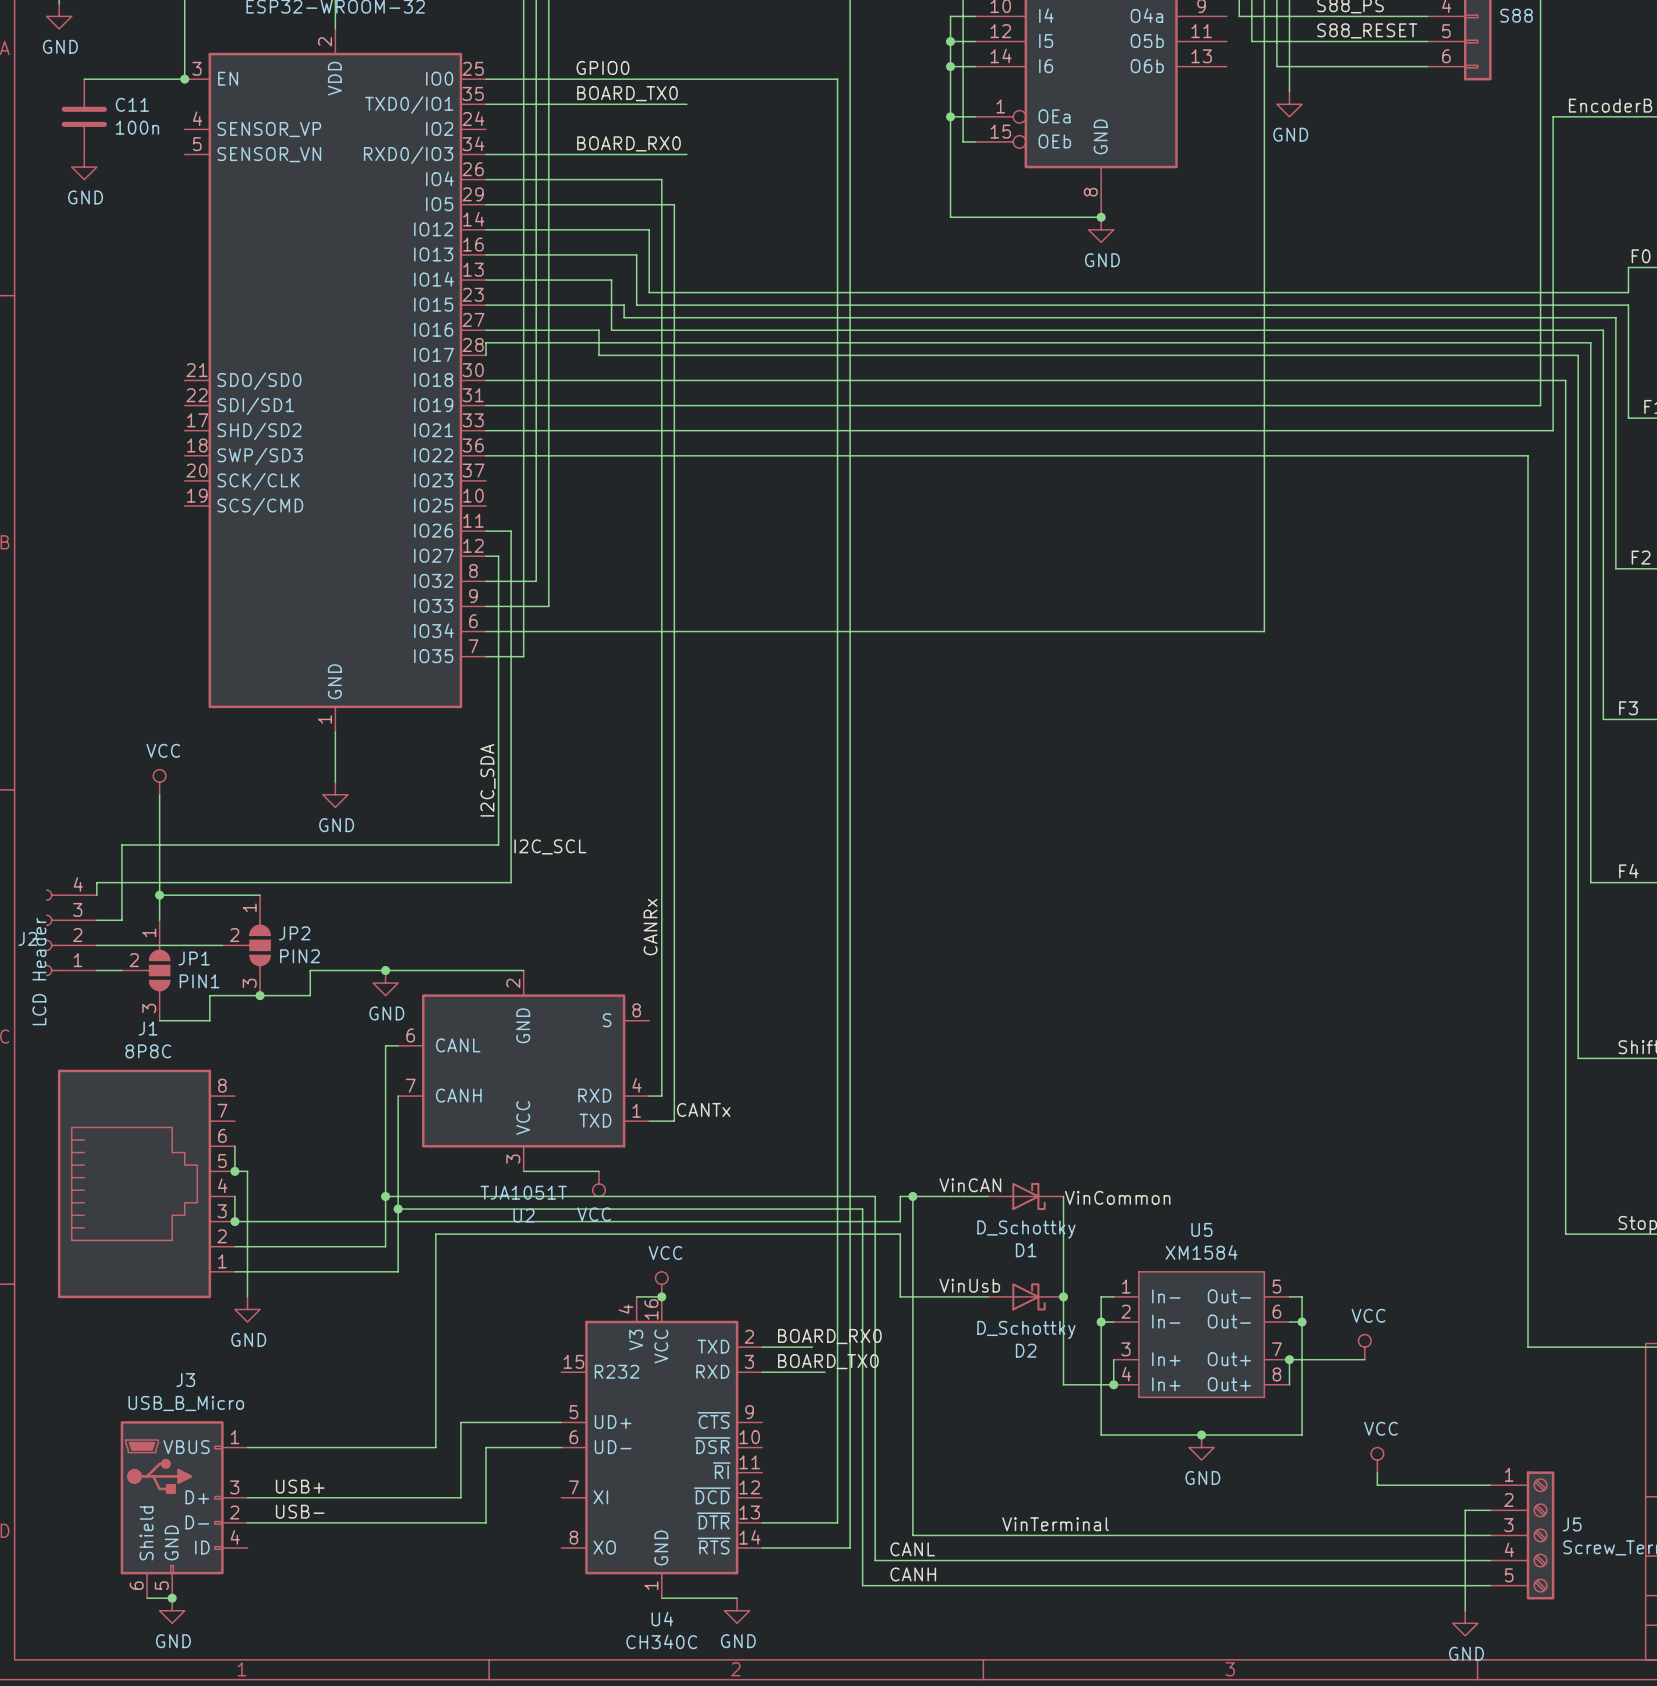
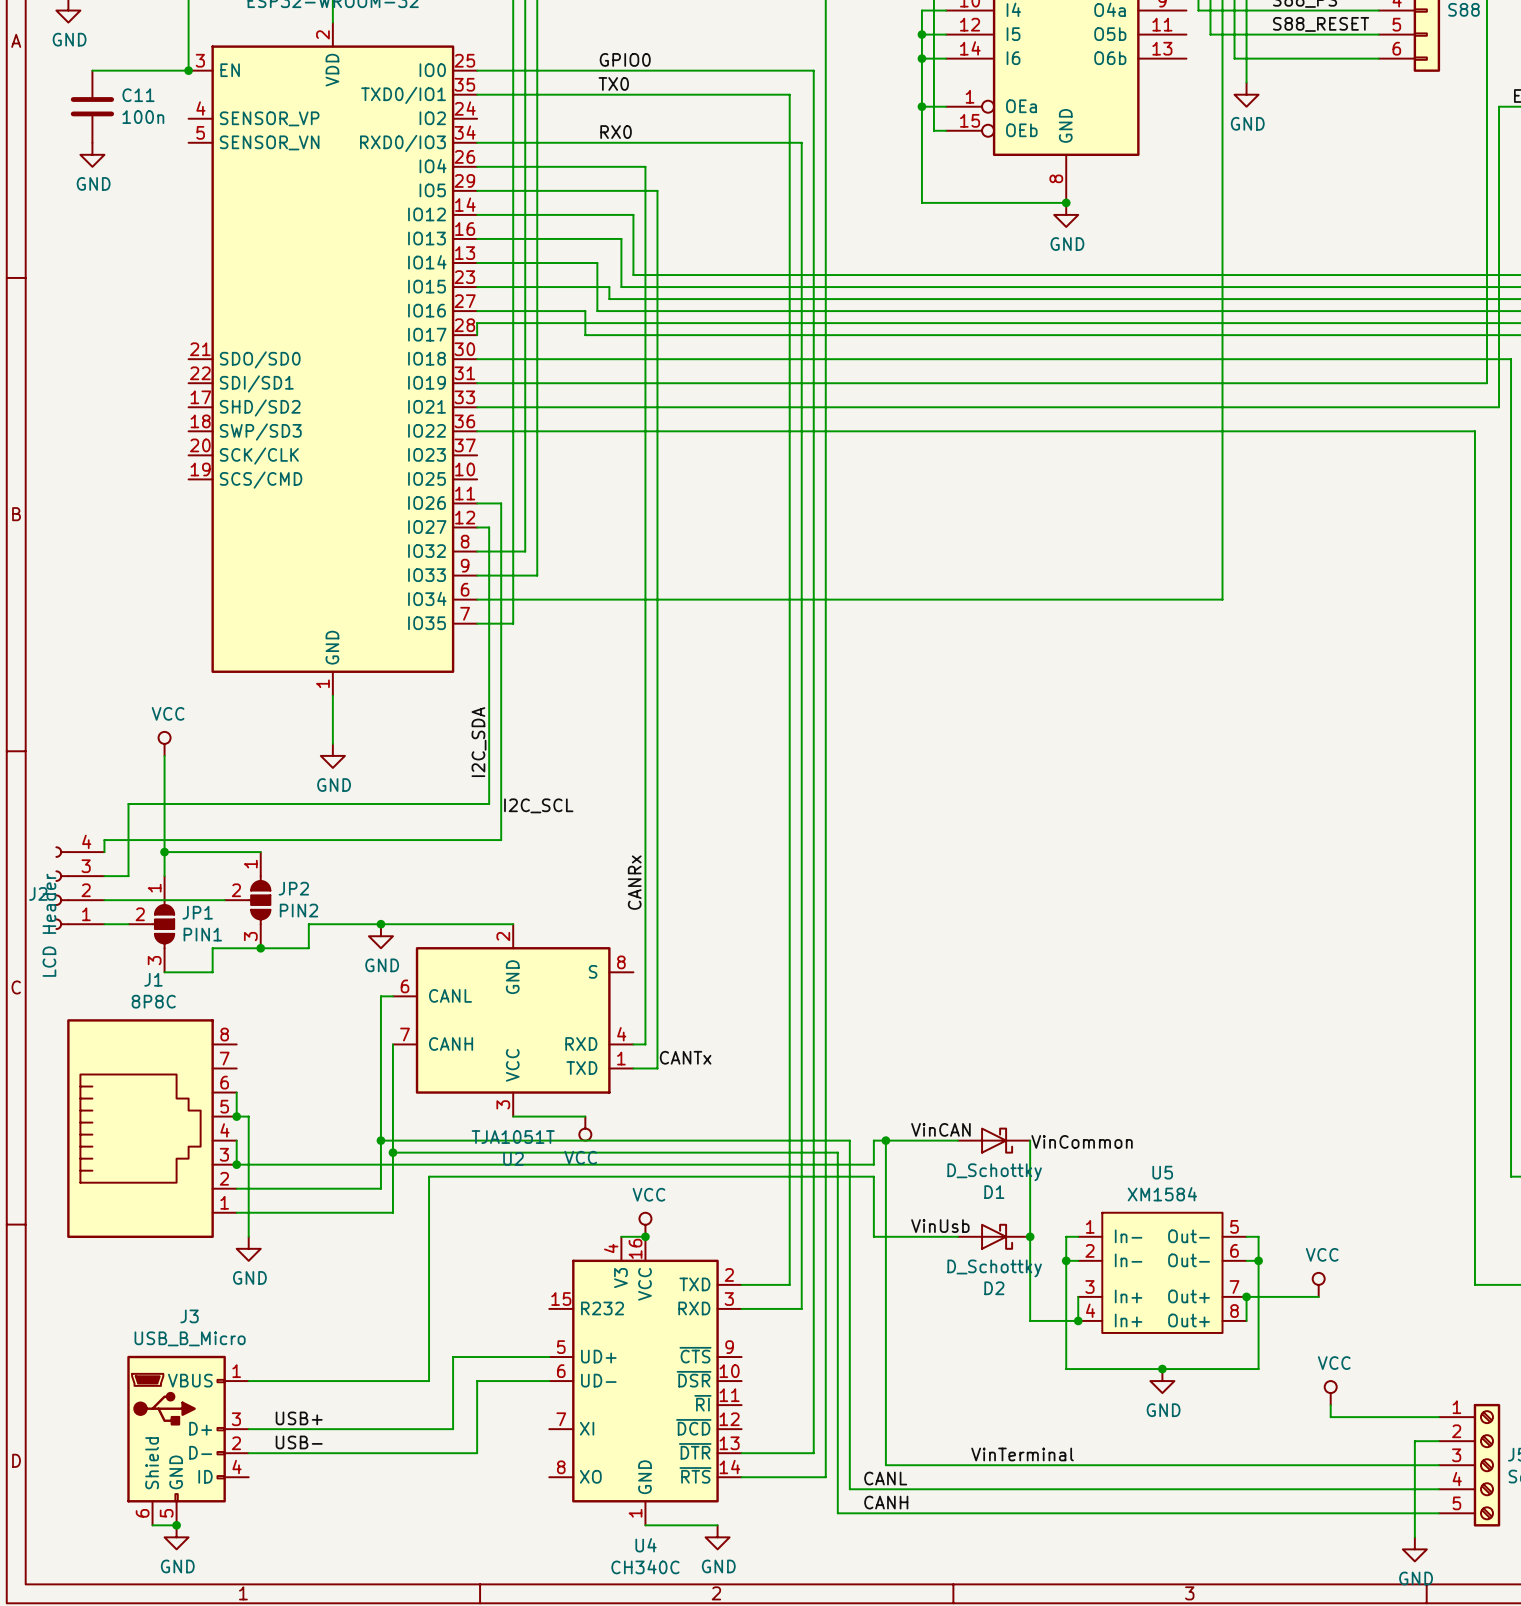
label position: GPIO0 (602, 67) -> GPIO0 (625, 59)
label: BOARD_TX0 (627, 93) -> none
label: none -> TX0 (613, 83)
wire: none -> (669, 94) (789, 94) (789, 1284)
label: BOARD_RX0 (628, 143) -> none
label: none -> RX0 (616, 132)
wire: none -> (669, 142) (801, 142) (801, 1308)
label: BOARD_RX0 (829, 1336) -> none
label: BOARD_TX0 (828, 1361) -> none

